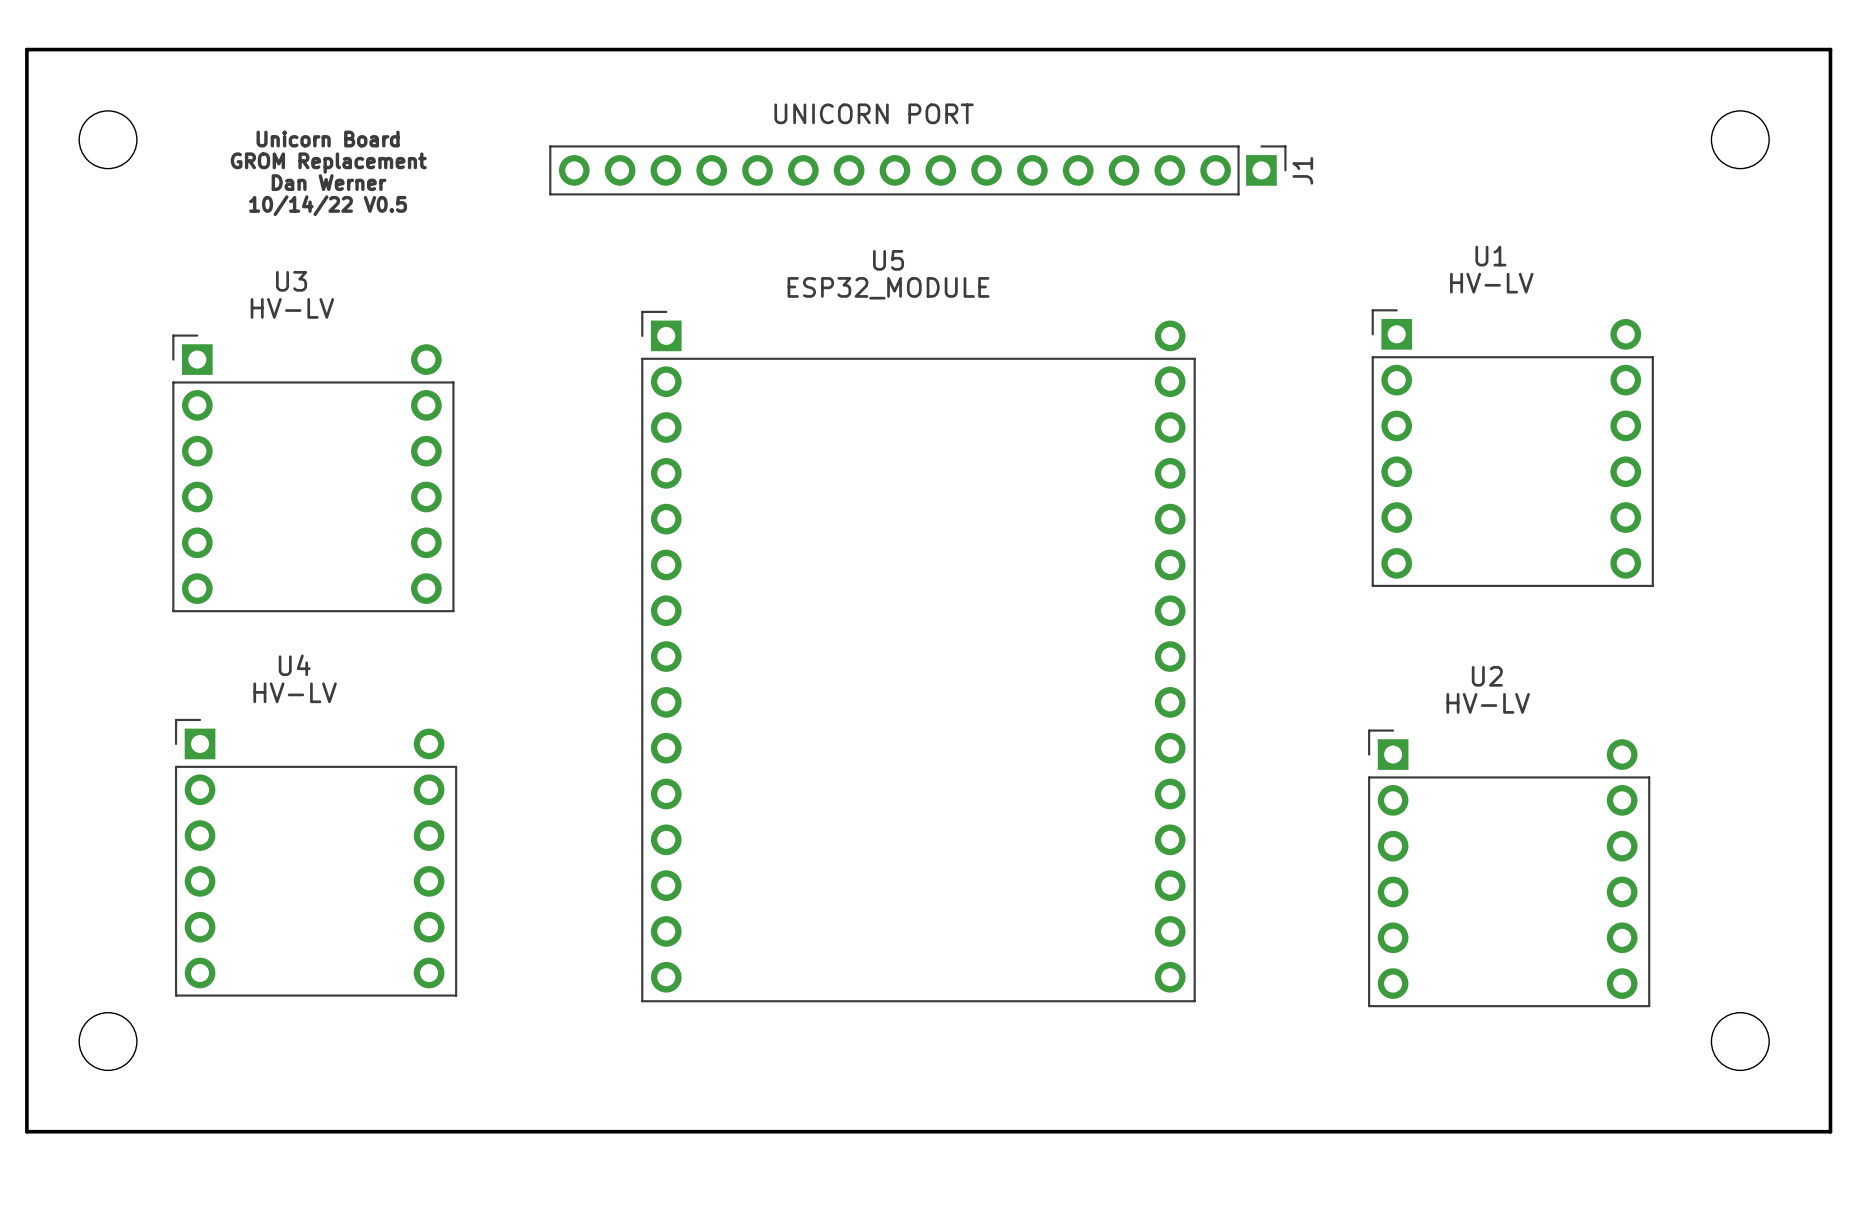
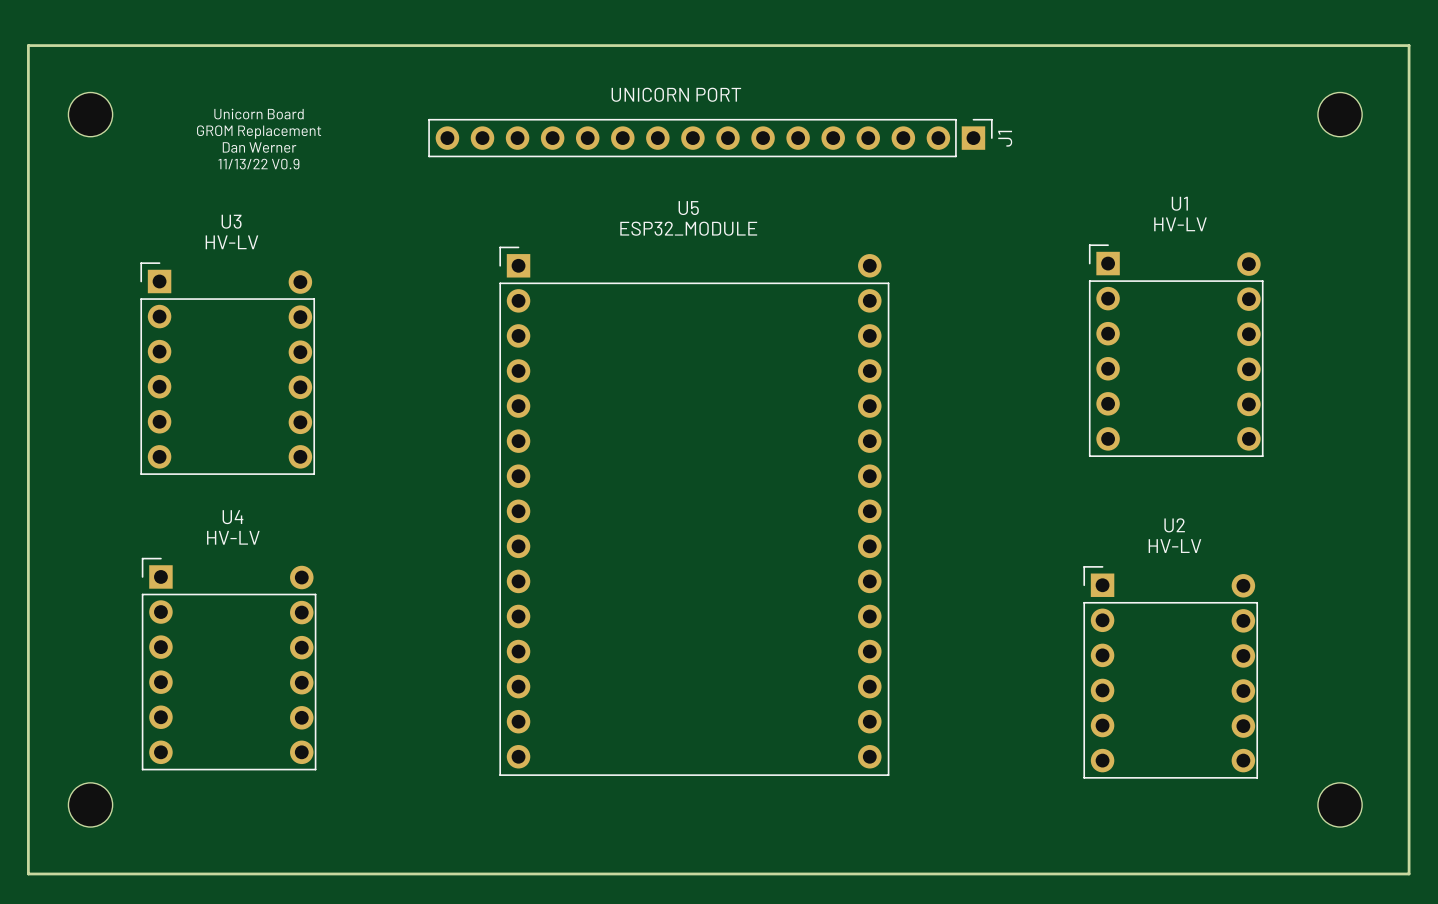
text: 10/14/22 V0.5 (328, 205) -> 11/13/22 V0.9 (258, 164)
U1 footprint: [1371, 309, 1654, 587] -> [1088, 244, 1264, 457]
U5 footprint: [641, 310, 1196, 1003] -> [499, 246, 890, 776]
U3 footprint: [172, 334, 455, 613] -> [140, 262, 316, 475]
U4 footprint: [174, 718, 458, 997] -> [141, 557, 317, 771]
U2 footprint: [1368, 729, 1651, 1008] -> [1083, 566, 1259, 779]

